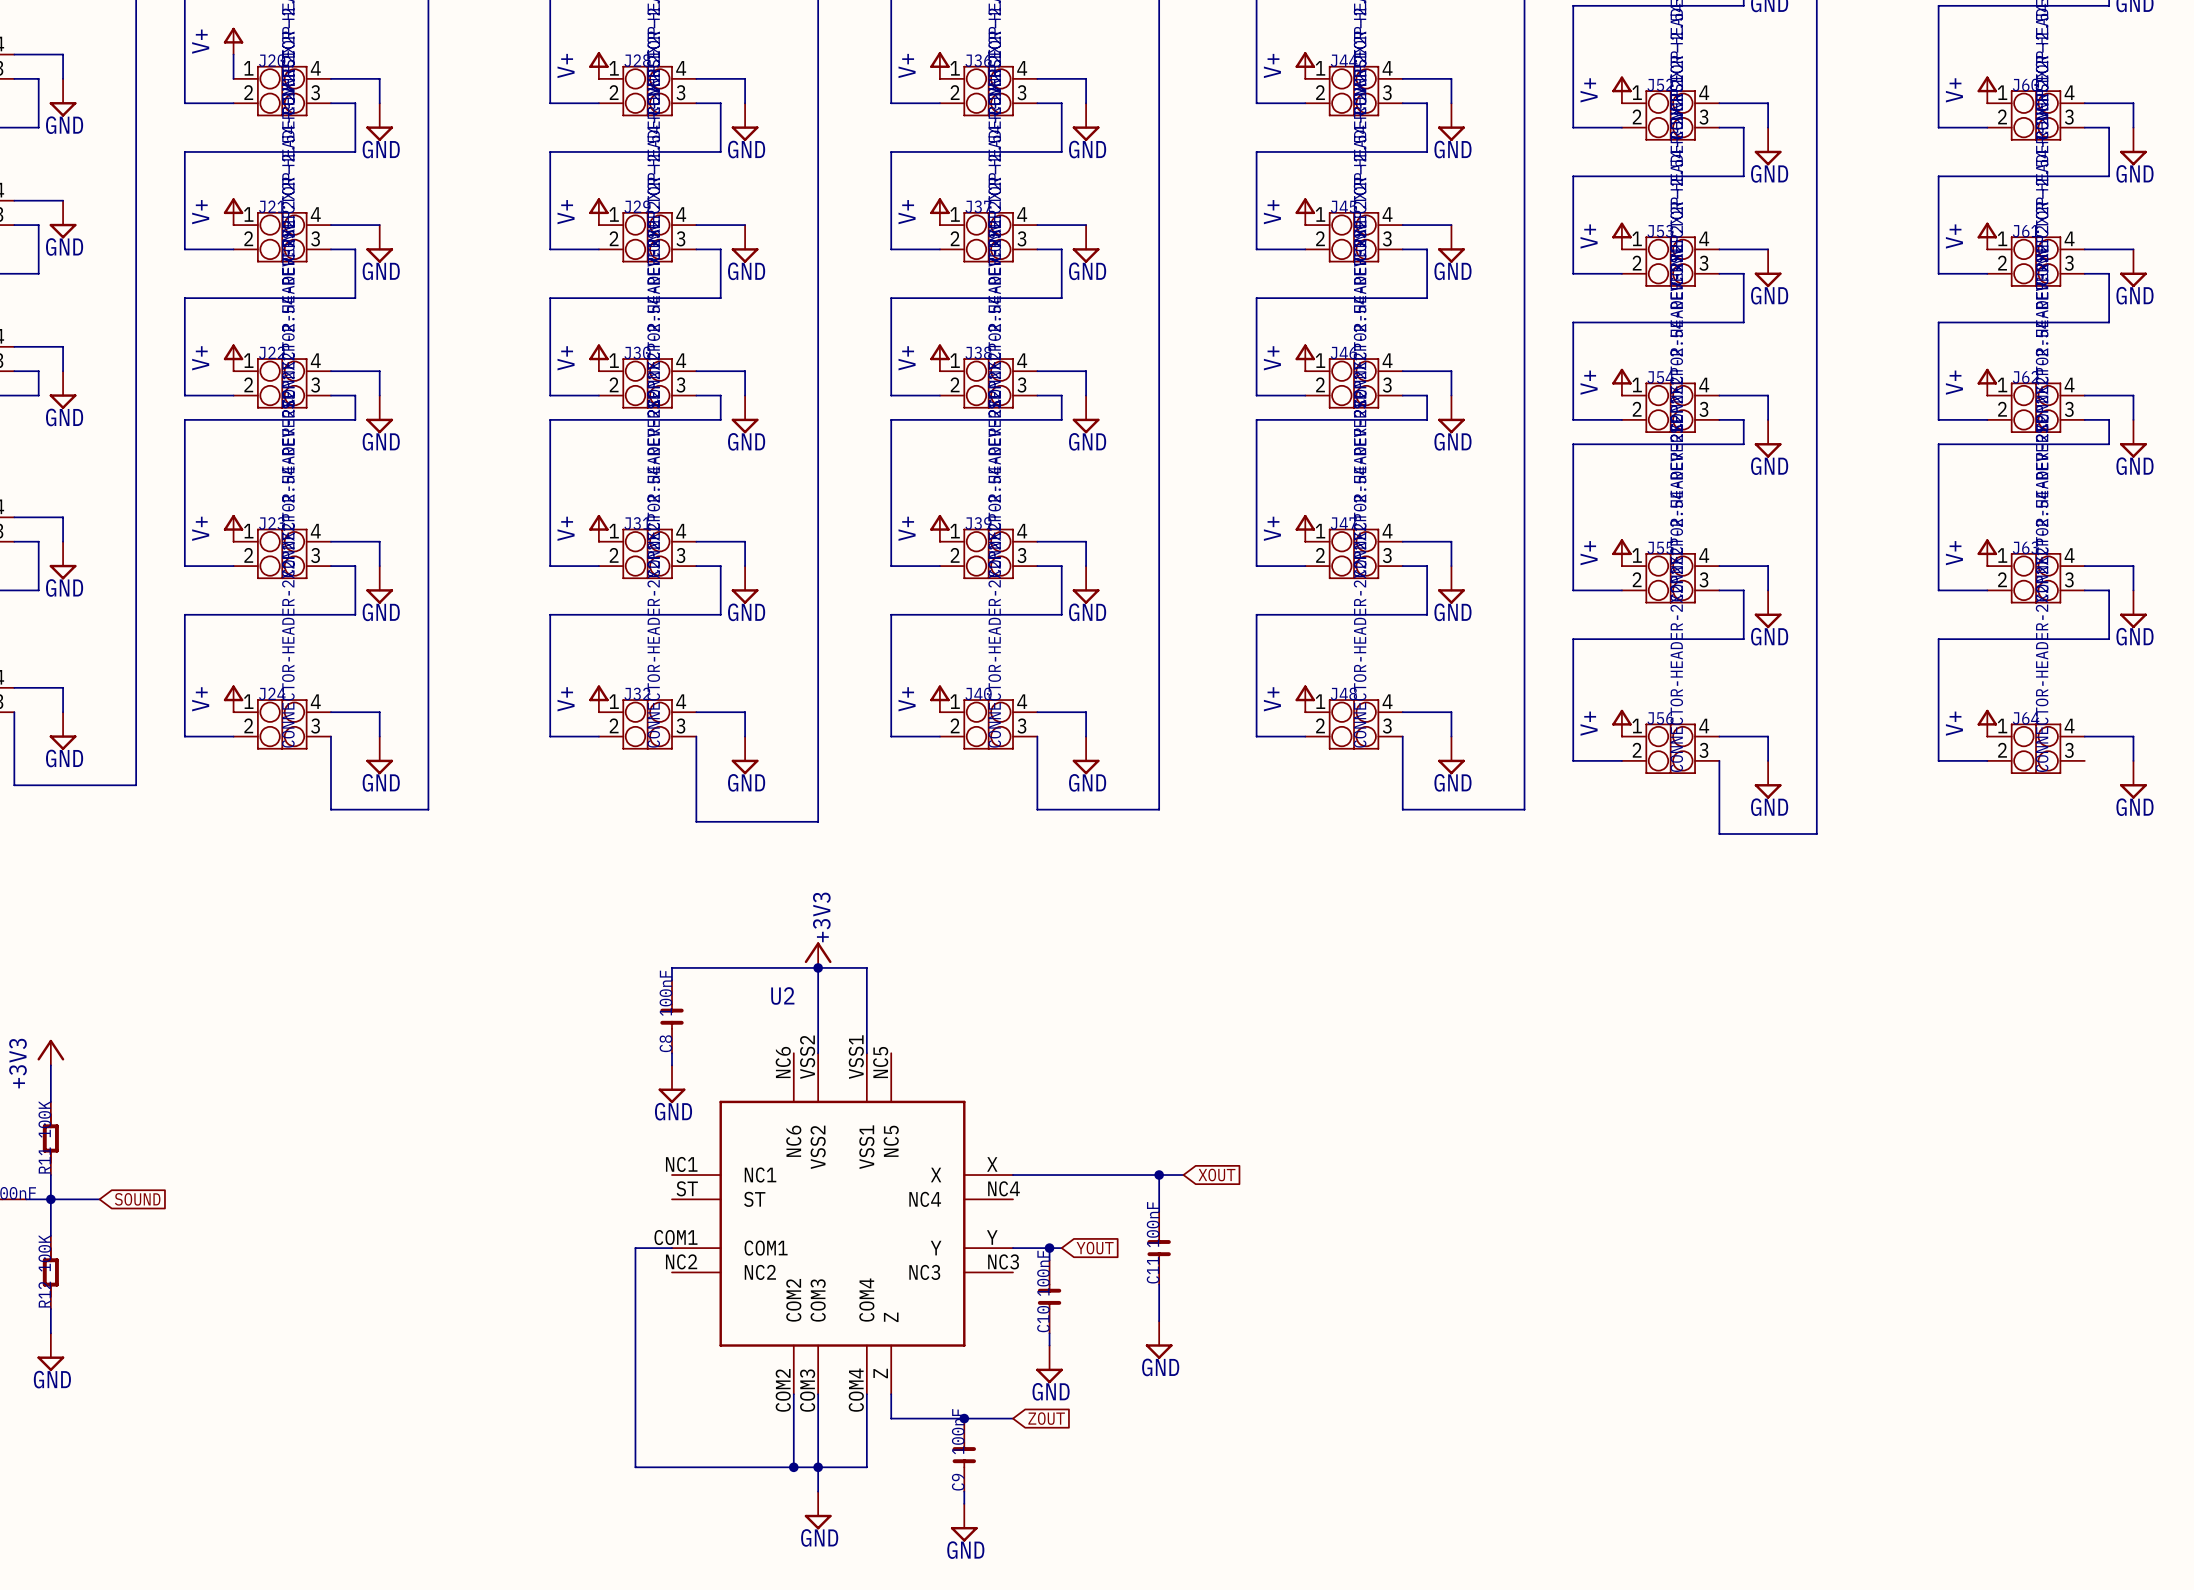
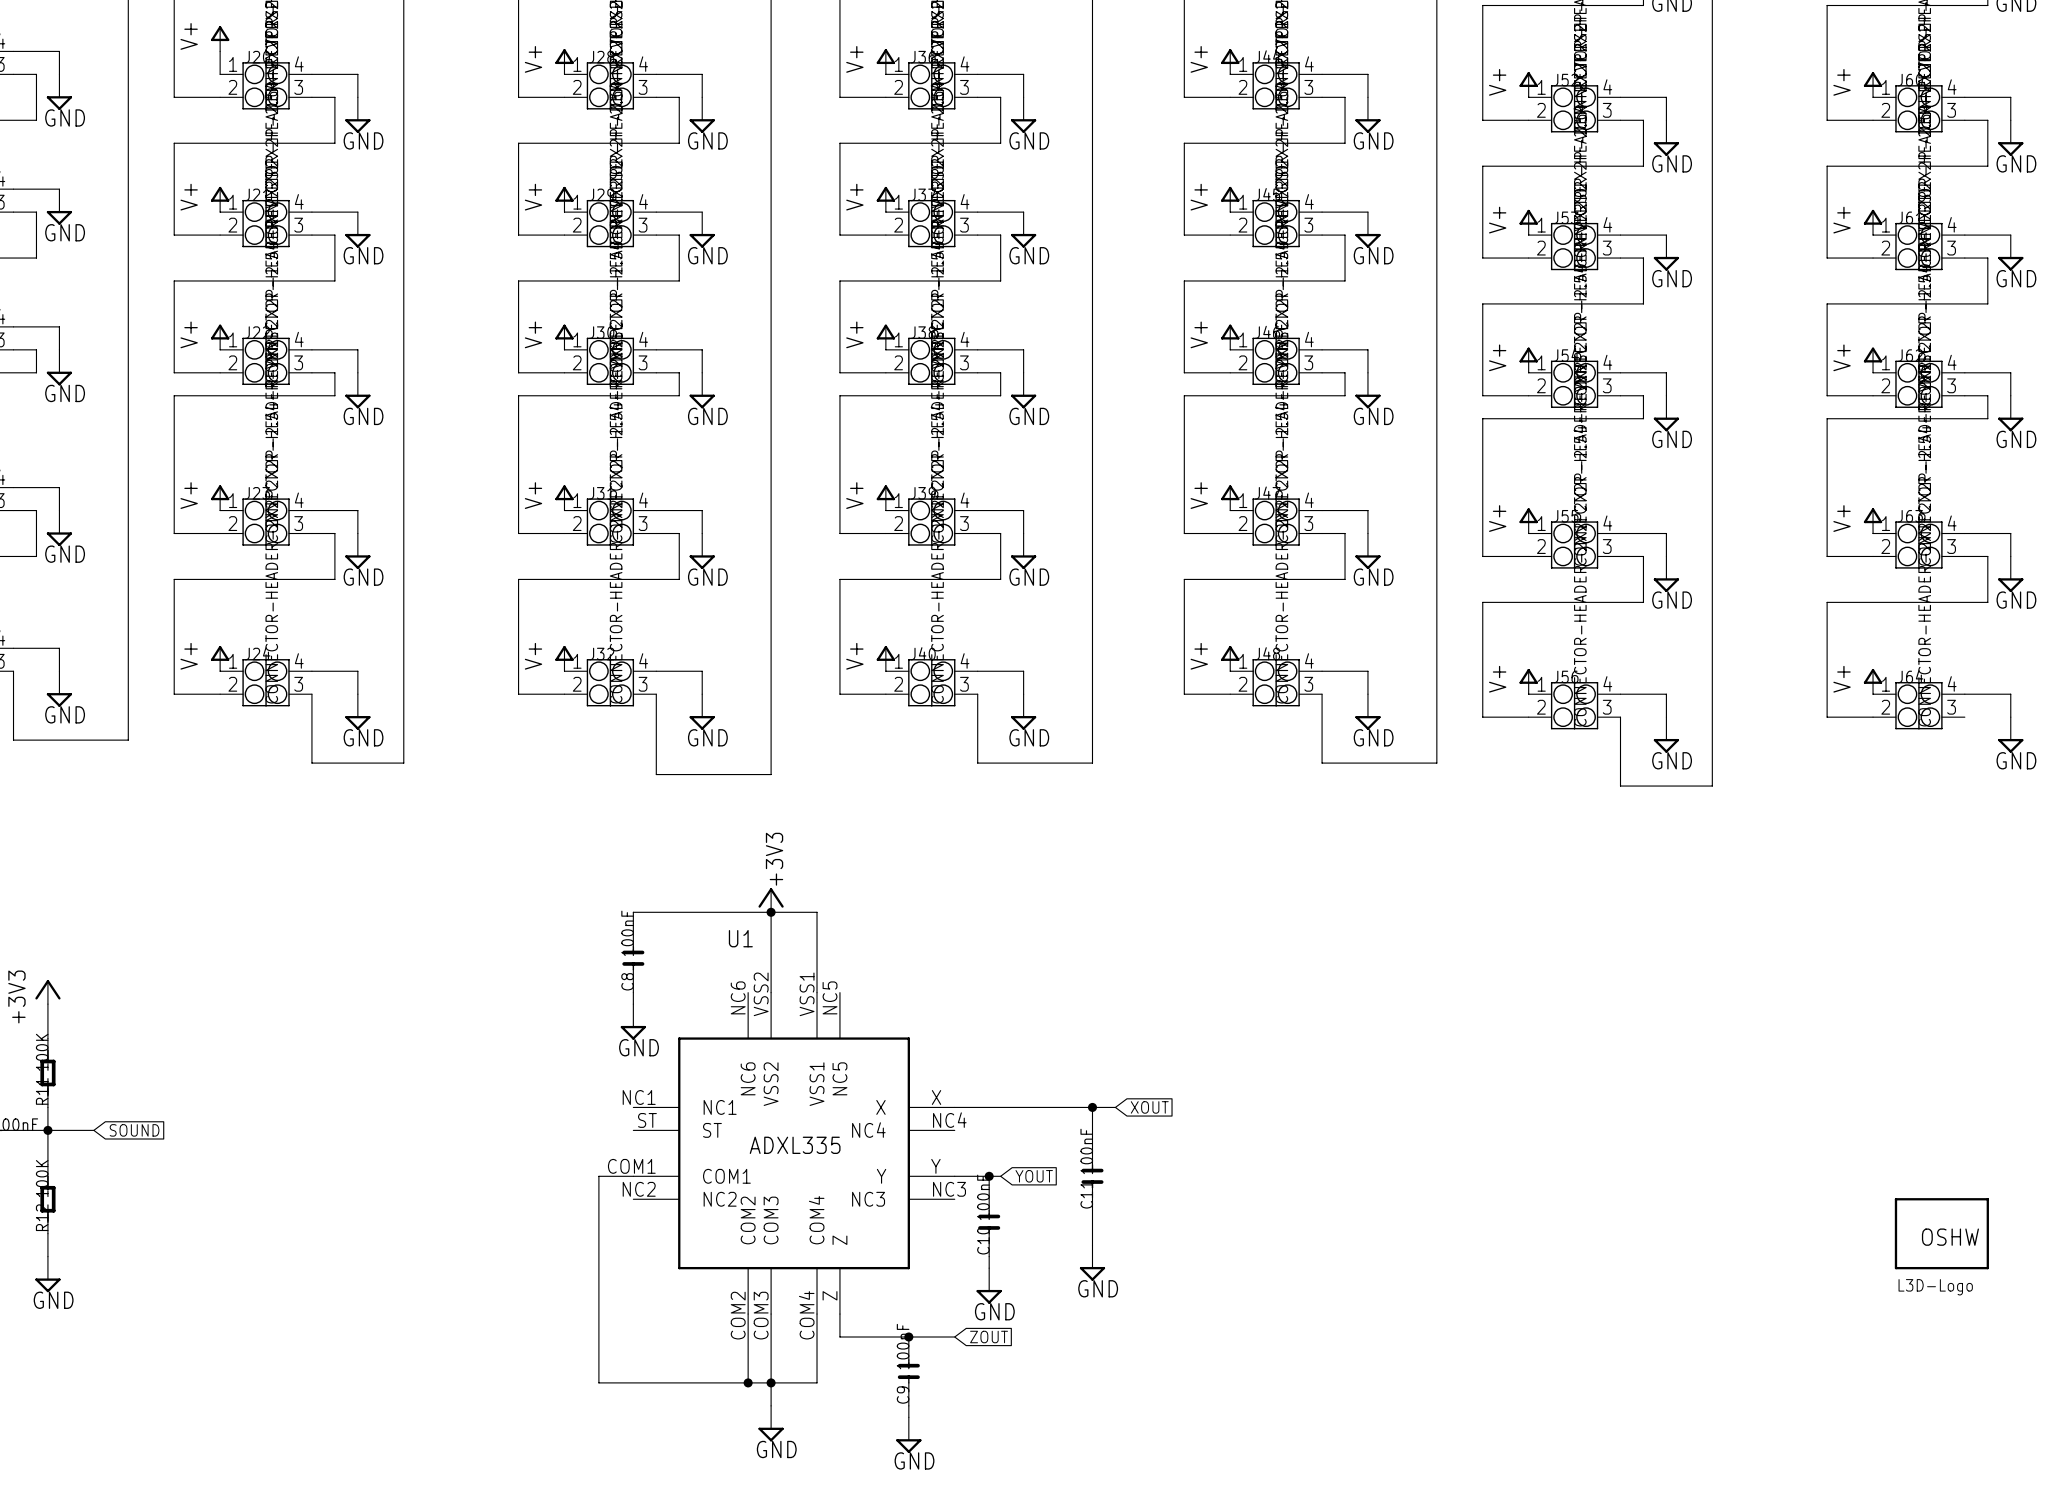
U2 name: U2 (782, 995) -> U1 (740, 938)
U2 value: none -> ADXL335 (795, 1145)
part: none -> (1941, 1233)
part: none -> (1935, 1287)

